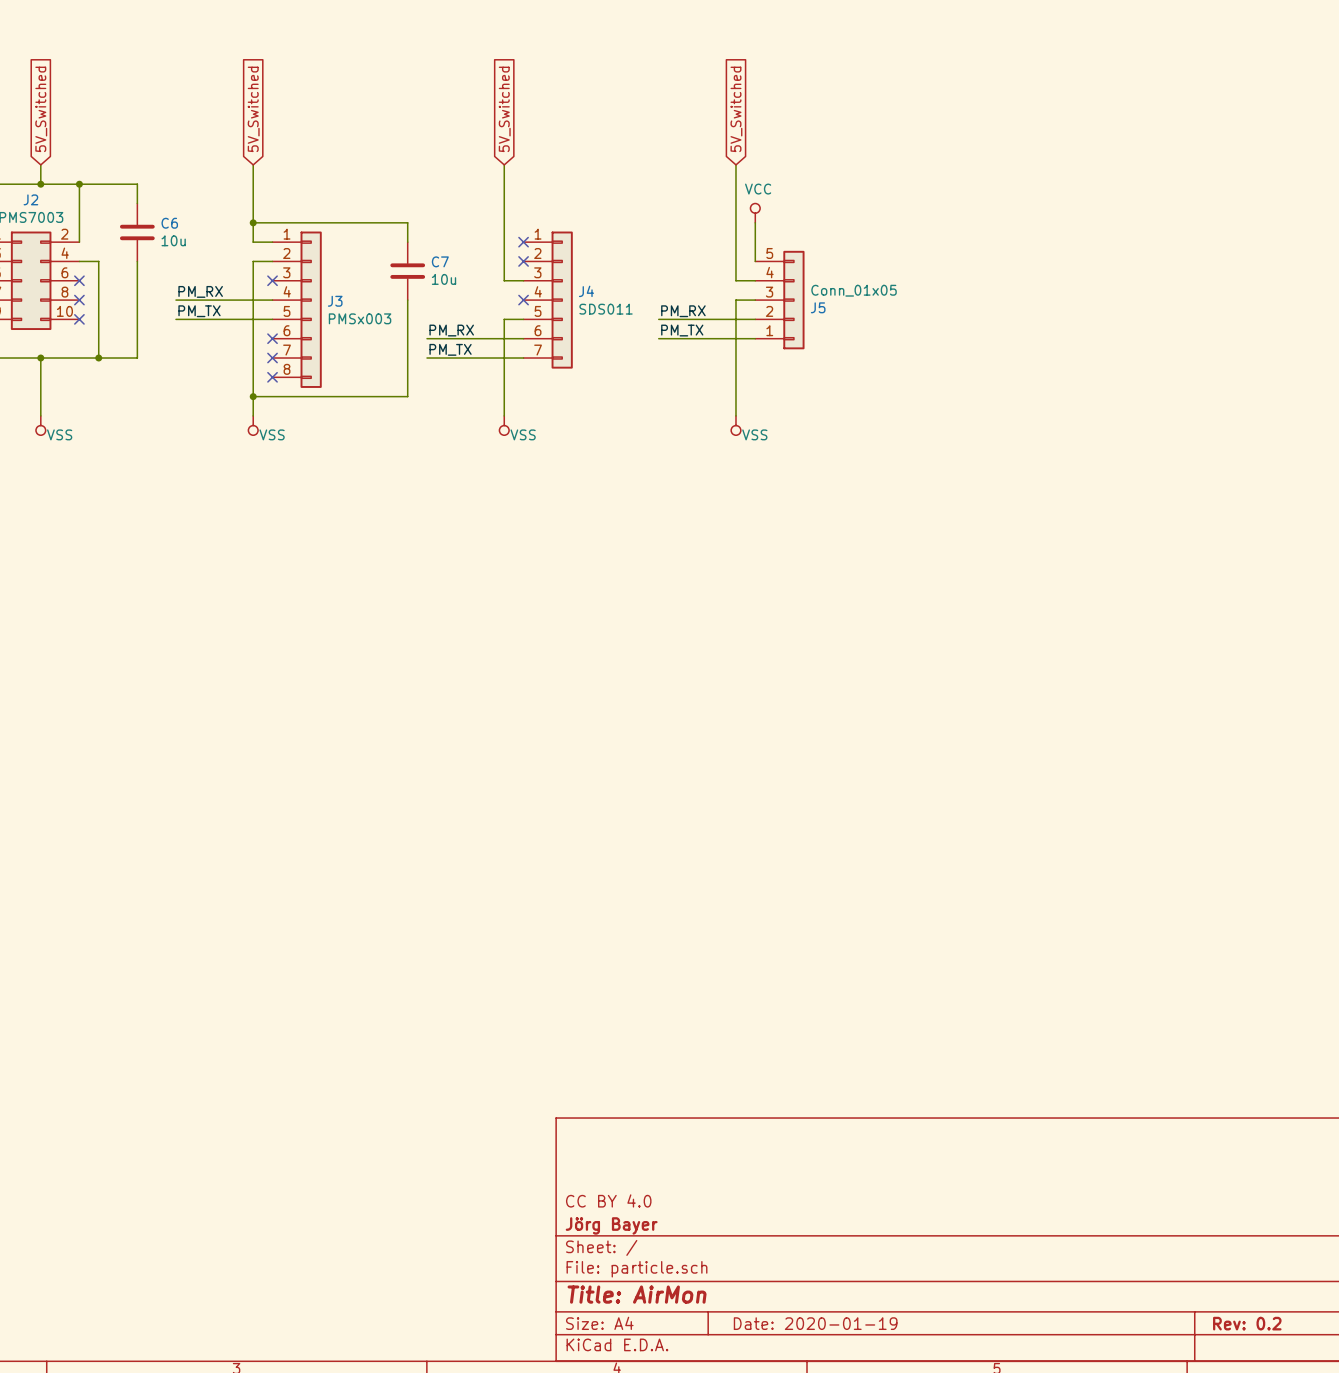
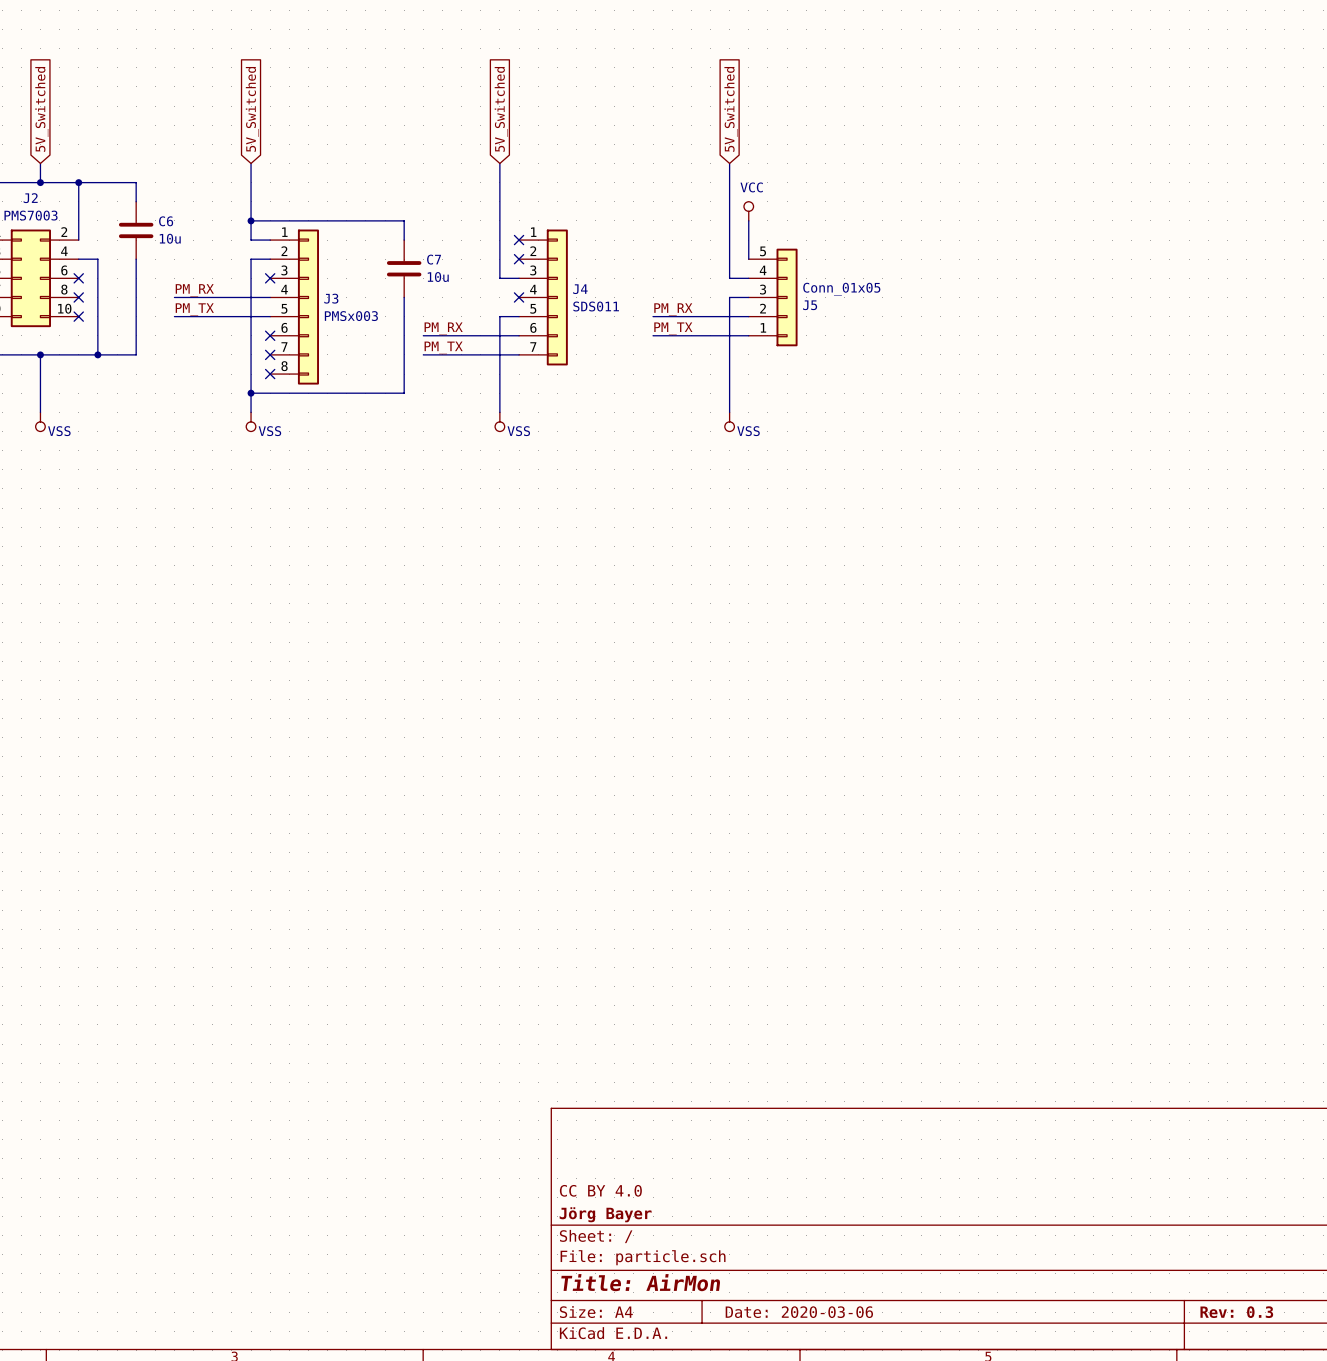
title block: Date: 2020-01-19 (815, 1323) -> Date: 2020-03-06 (799, 1312)
title block: Rev: 0.2 (1247, 1323) -> Rev: 0.3 (1236, 1312)

